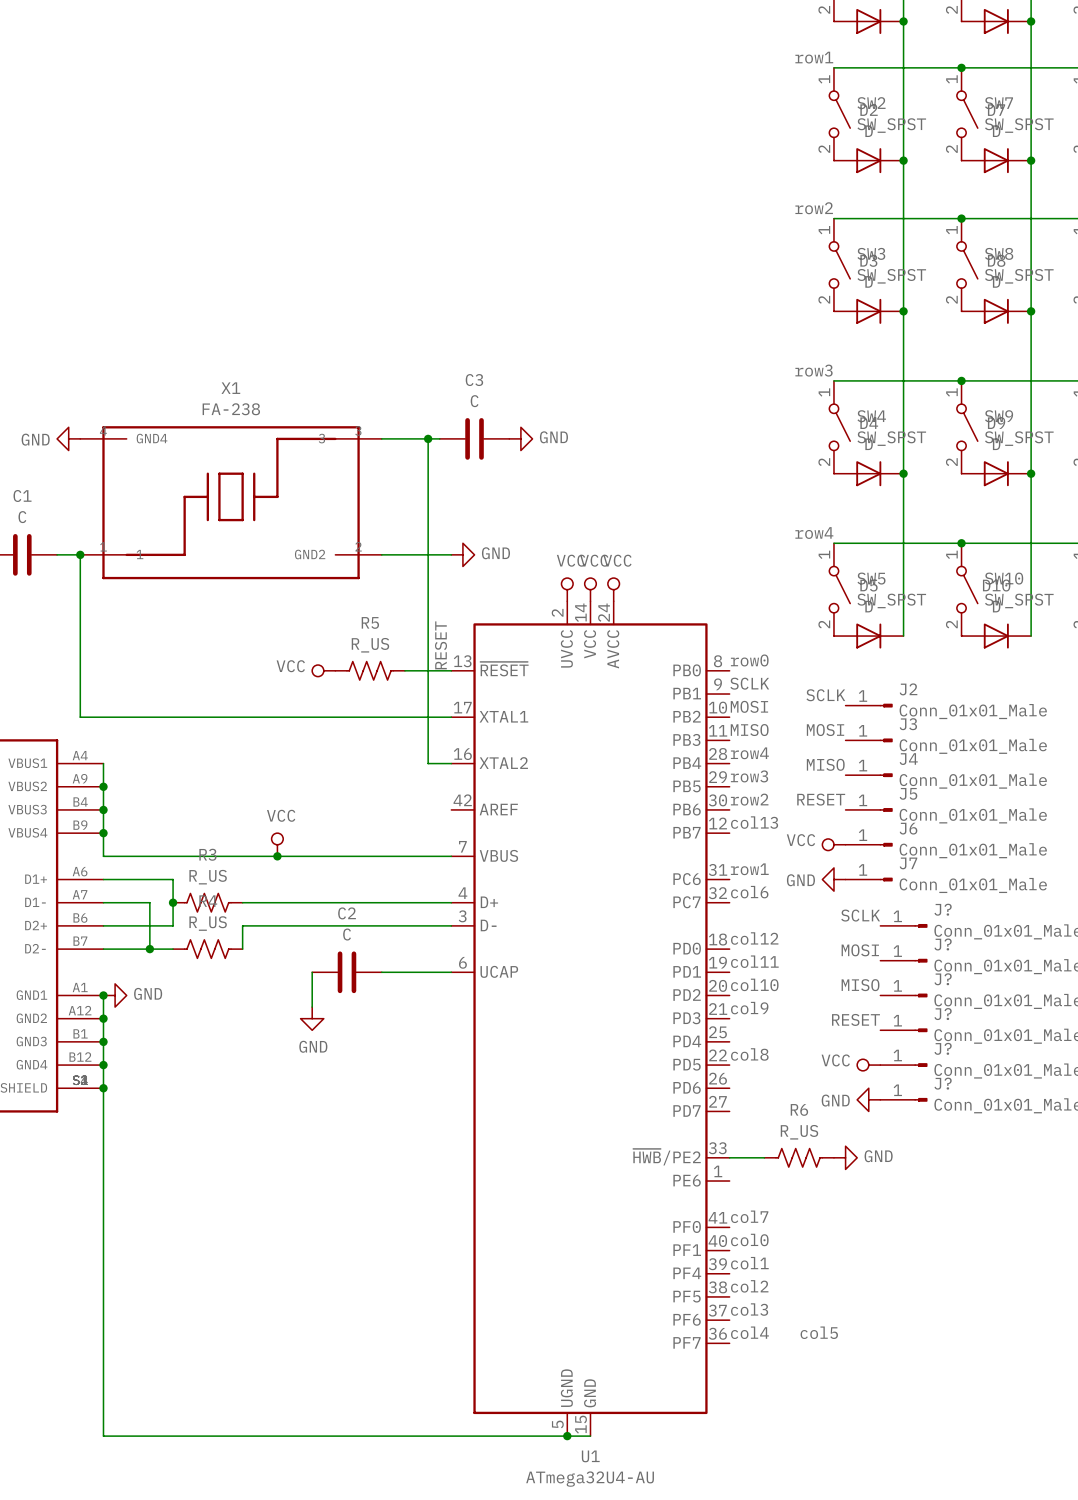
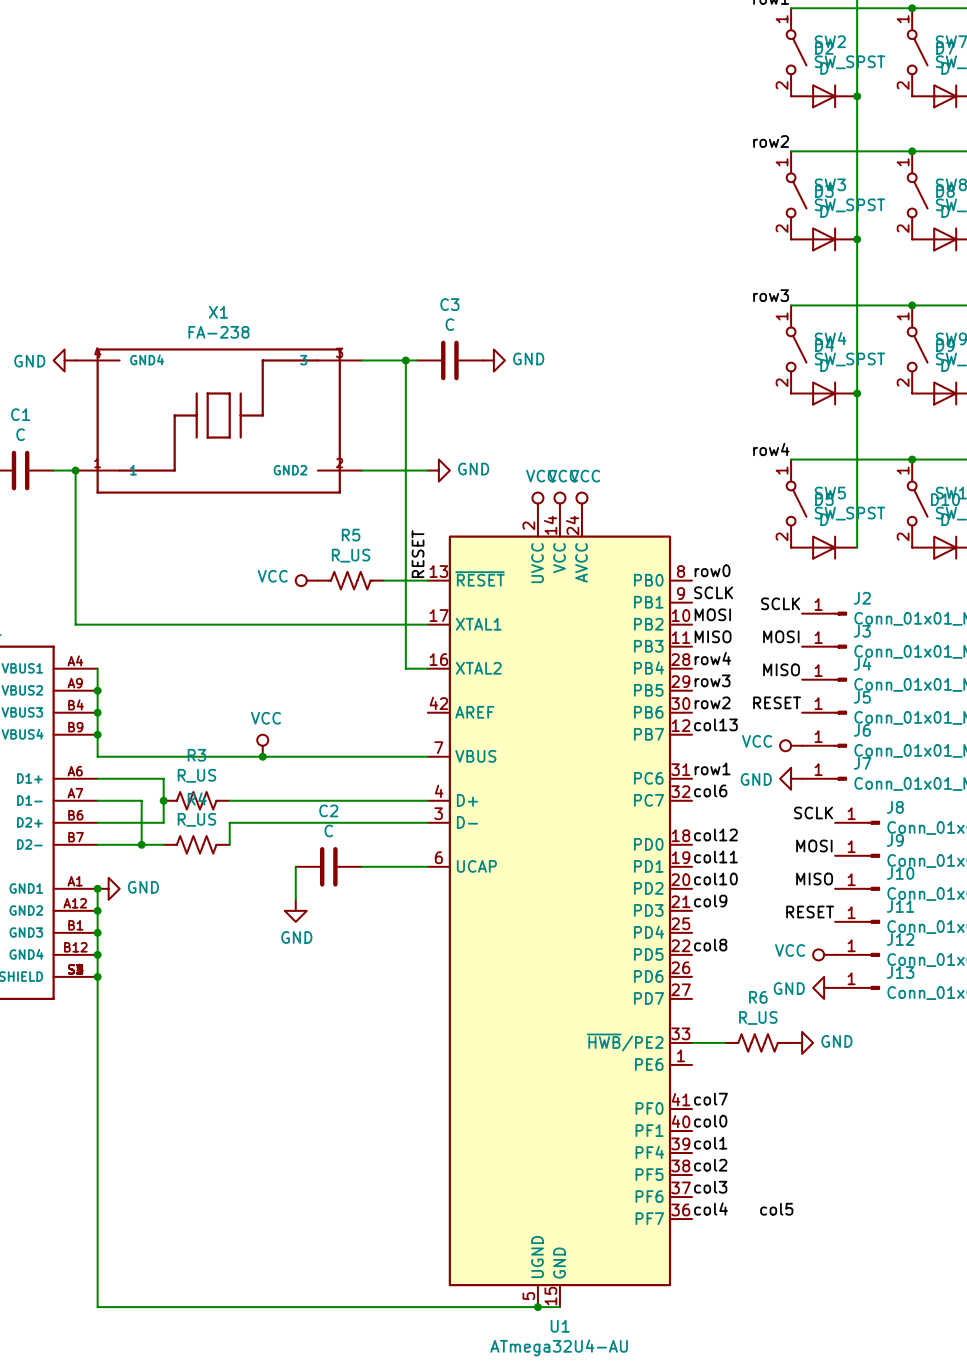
J? name: J? (943, 909) -> J8 (895, 807)
J? name: J? (943, 944) -> J9 (895, 840)
J? name: J? (943, 979) -> J10 (900, 873)
J? name: J? (943, 1014) -> J11 (900, 906)
J? name: J? (943, 1048) -> J12 (900, 939)
J? name: J? (943, 1083) -> J13 (900, 972)

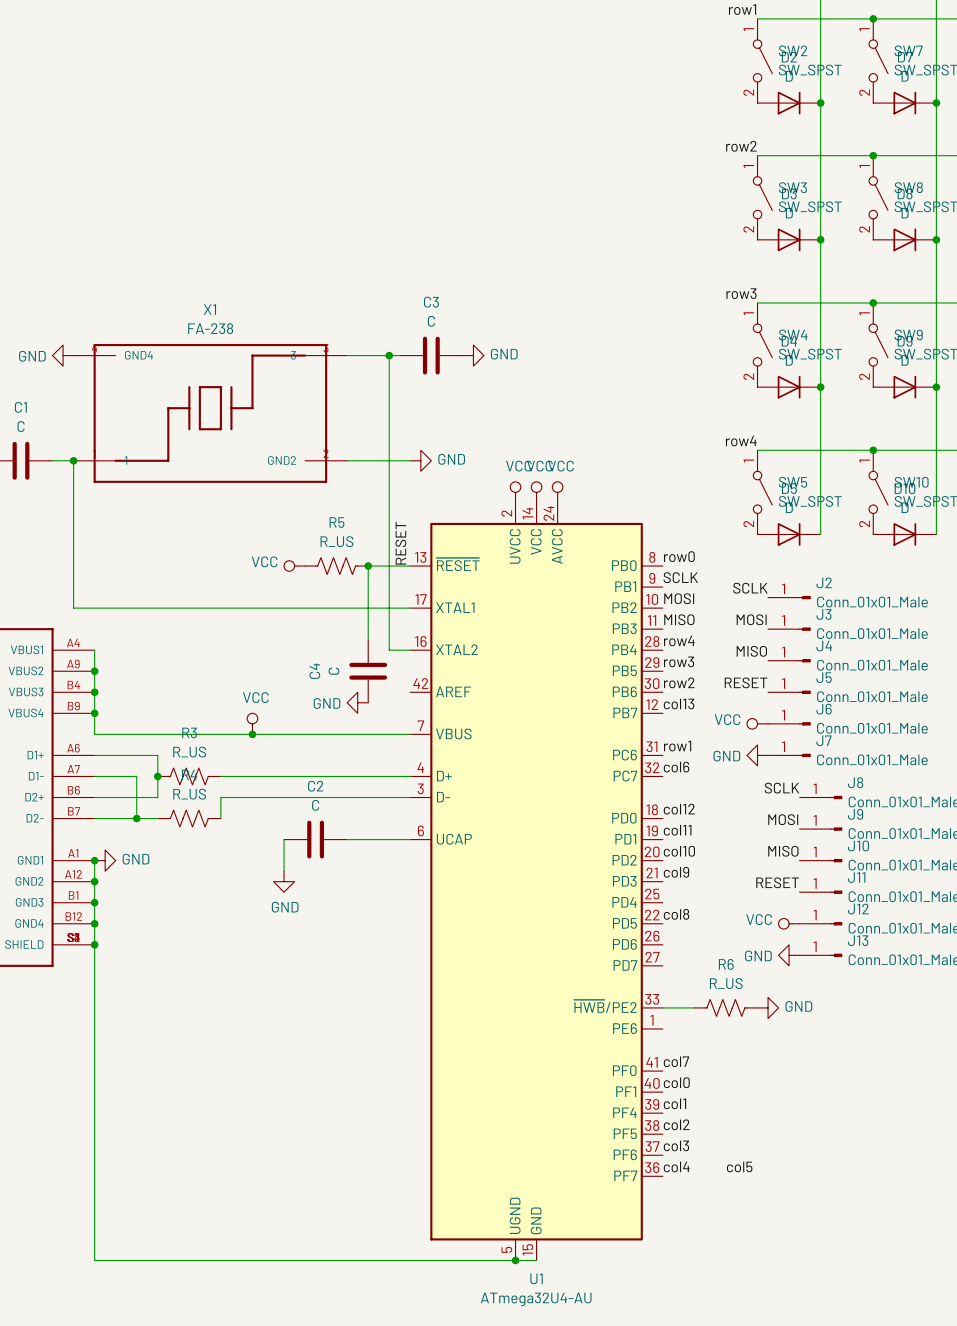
wire: none -> (368, 566) (368, 639)
junction: none -> (368, 566)
C4: none -> C (368, 671)
power symbol: none -> GND (357, 702)

